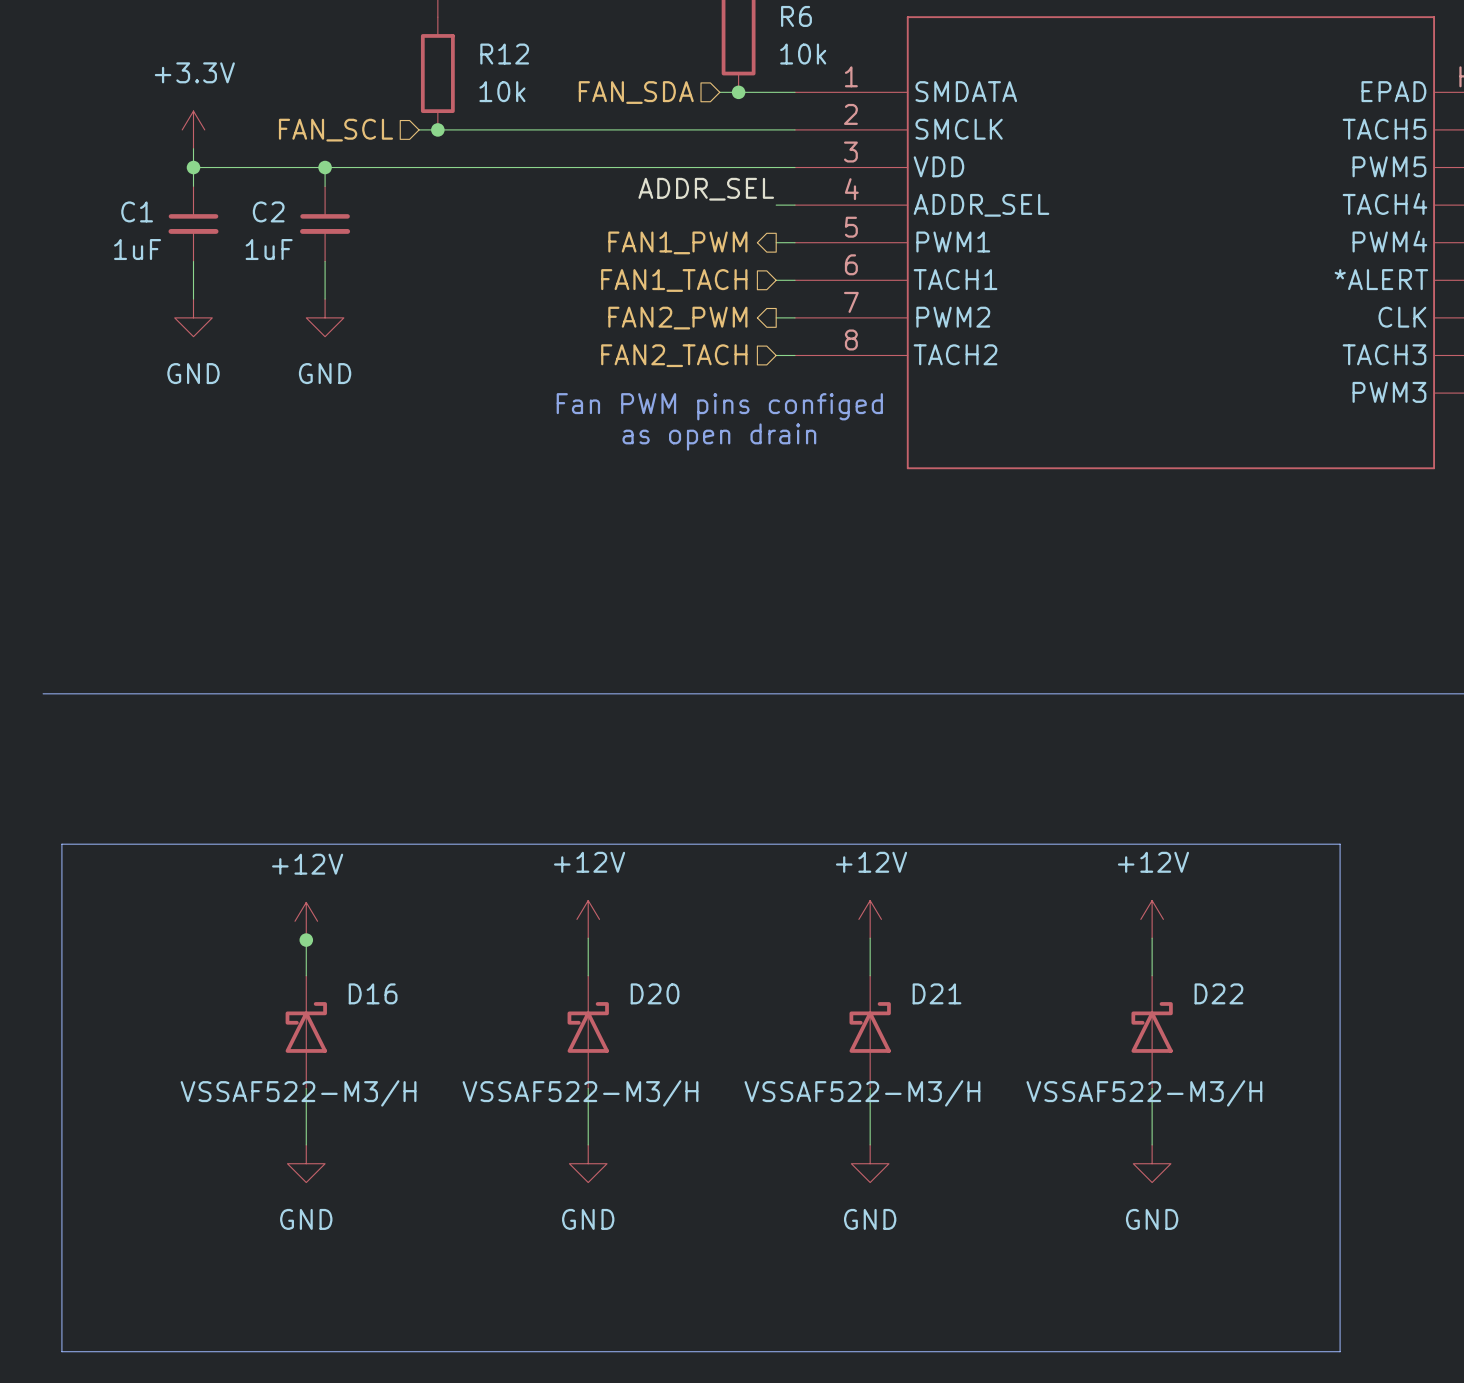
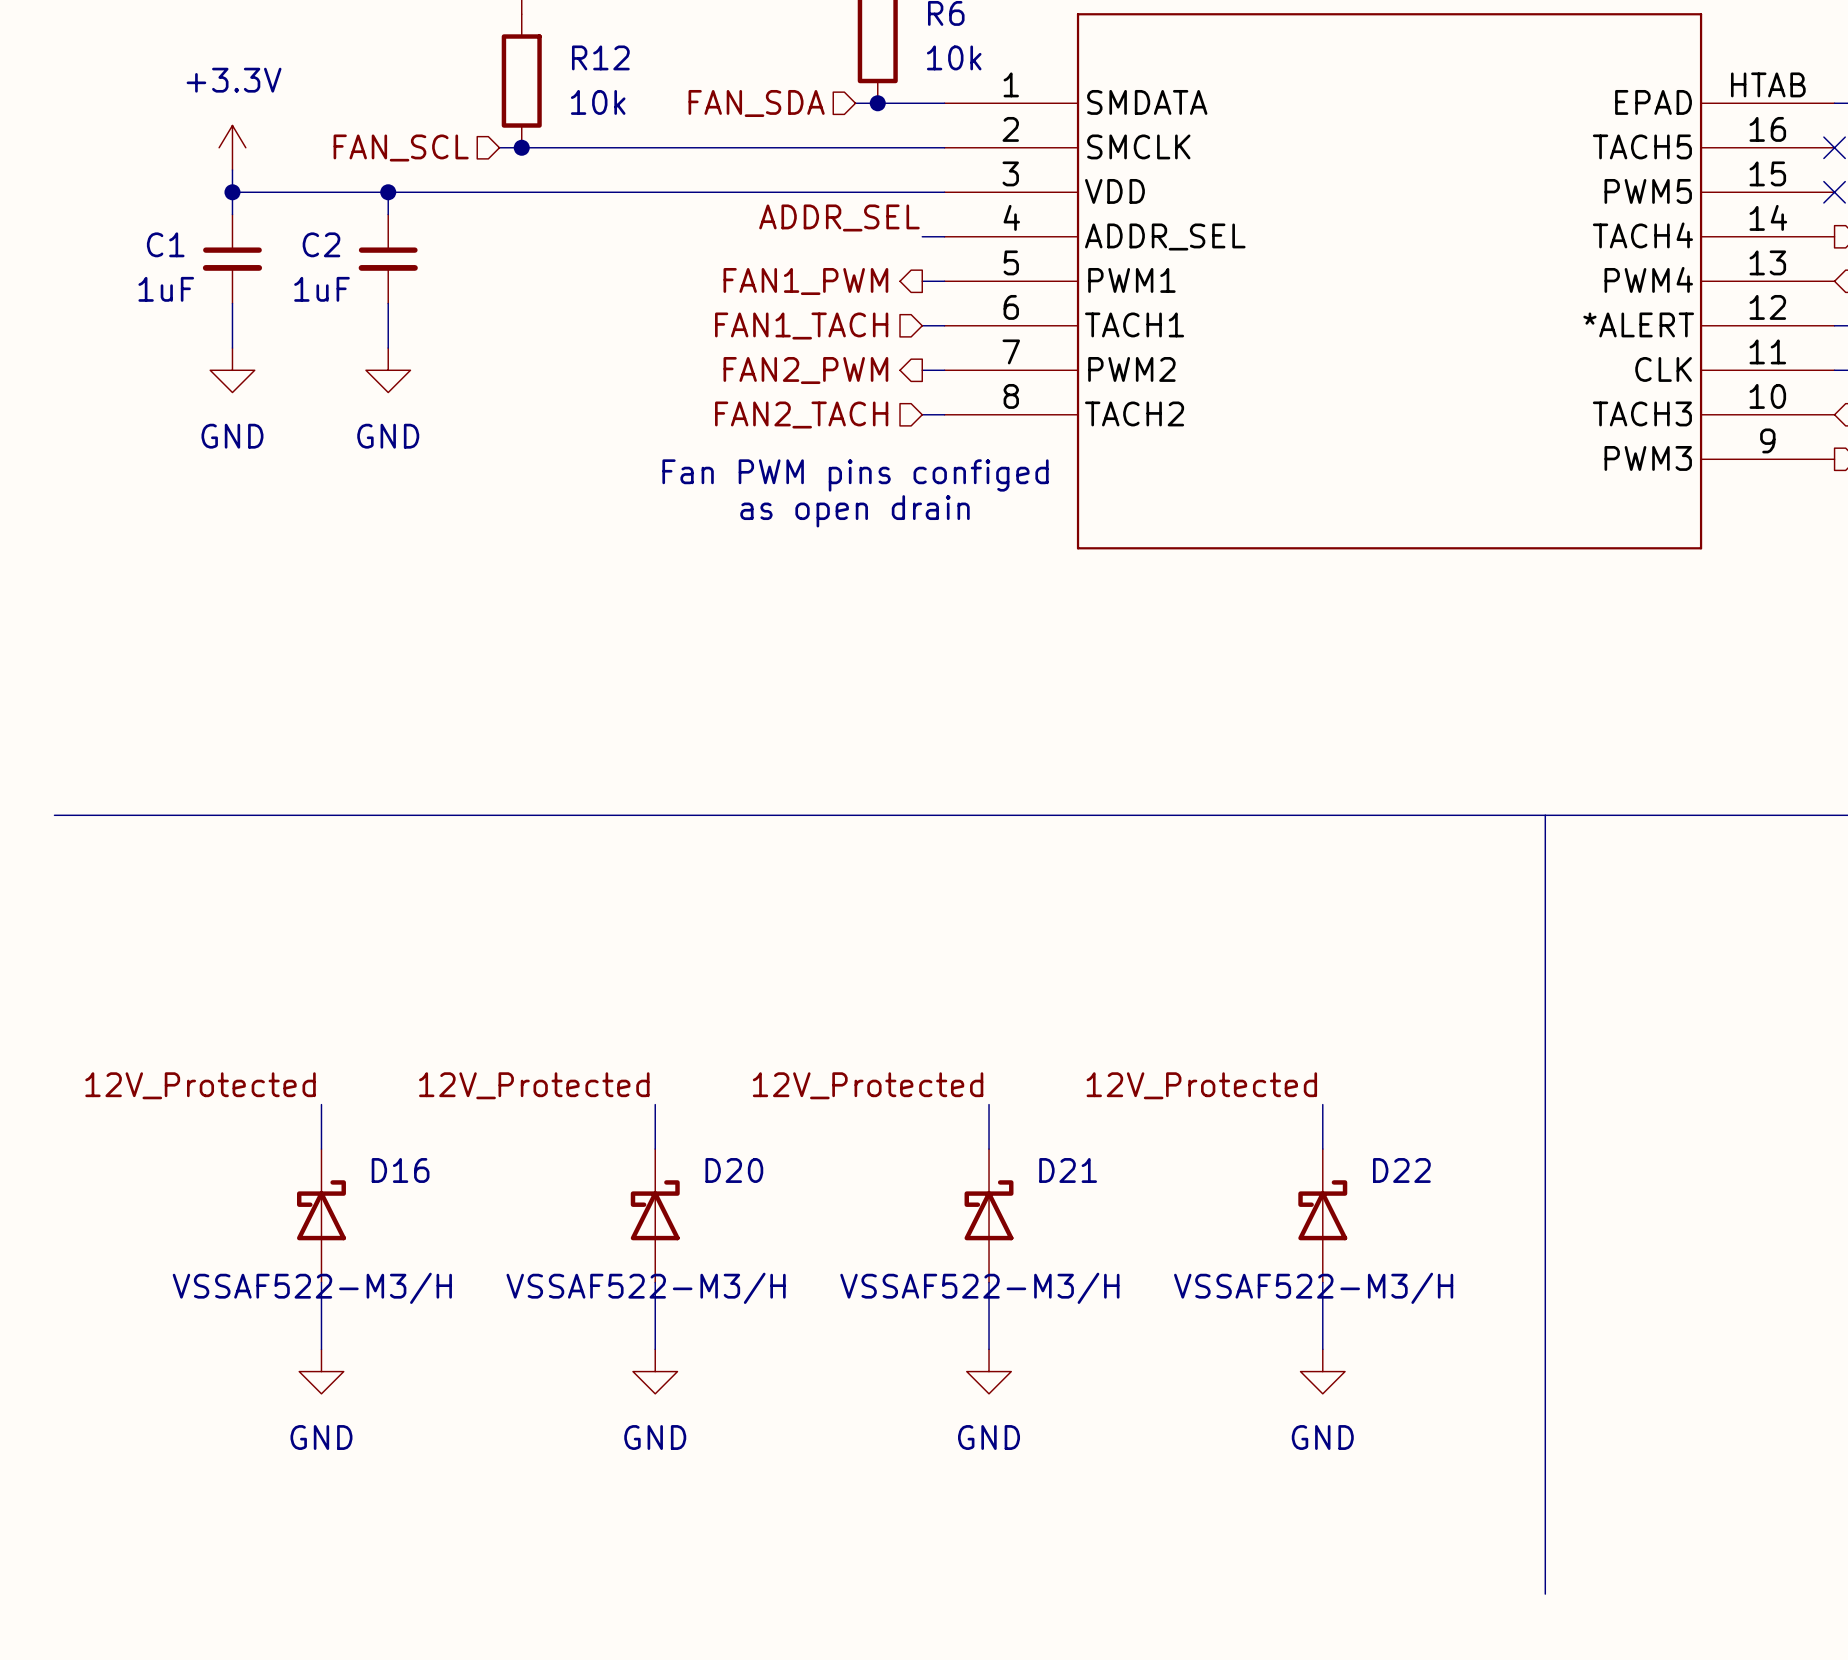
line: none -> (1545, 815) (1545, 1594)
line: (61, 844) (1340, 844) (1340, 1351) (61, 1351) (61, 844) -> none
power symbol: +12V (588, 919) -> none
power symbol: +12V (870, 919) -> none
power symbol: +12V (1152, 919) -> none
power symbol: +12V (306, 921) -> none
label: none -> 12V_Protected (200, 1085)
label: none -> 12V_Protected (534, 1085)
label: none -> 12V_Protected (868, 1085)
label: none -> 12V_Protected (1201, 1085)
wire: (306, 938) (306, 975) -> (321, 1104) (321, 1149)
wire: (588, 938) (588, 975) -> (655, 1104) (655, 1149)
wire: (870, 938) (870, 975) -> (989, 1104) (989, 1149)
wire: (1152, 938) (1152, 975) -> (1322, 1104) (1322, 1149)
junction: (306, 940) -> none
D16 position: (306, 1032) -> (321, 1215)
D20 position: (588, 1032) -> (655, 1215)
D21 position: (870, 1032) -> (989, 1215)
D22 position: (1152, 1032) -> (1322, 1215)
wire: (306, 1088) (306, 1144) -> (321, 1282) (321, 1349)
wire: (588, 1088) (588, 1144) -> (655, 1282) (655, 1349)
wire: (870, 1088) (870, 1144) -> (989, 1282) (989, 1349)
wire: (1152, 1088) (1152, 1144) -> (1322, 1282) (1322, 1349)
power symbol position: GND (306, 1163) -> GND (321, 1371)
power symbol position: GND (588, 1163) -> GND (655, 1371)
power symbol position: GND (870, 1163) -> GND (989, 1371)
power symbol position: GND (1152, 1163) -> GND (1322, 1371)

